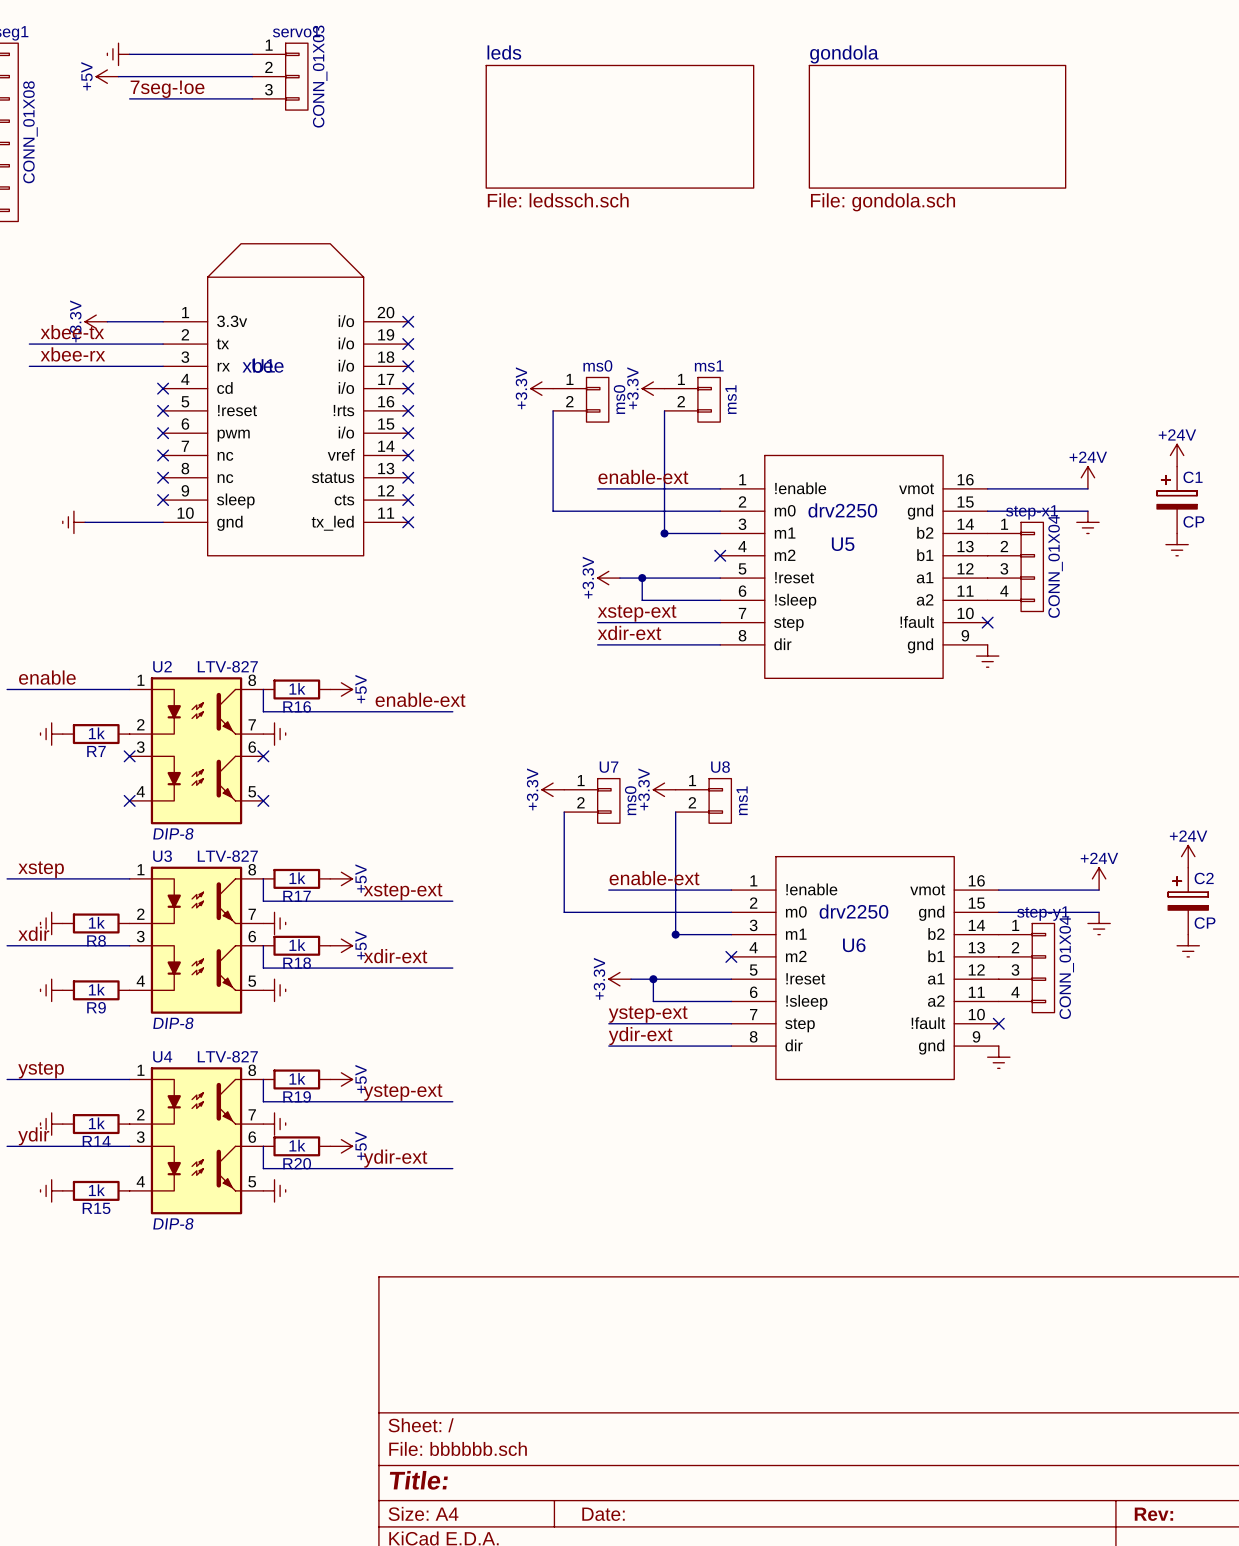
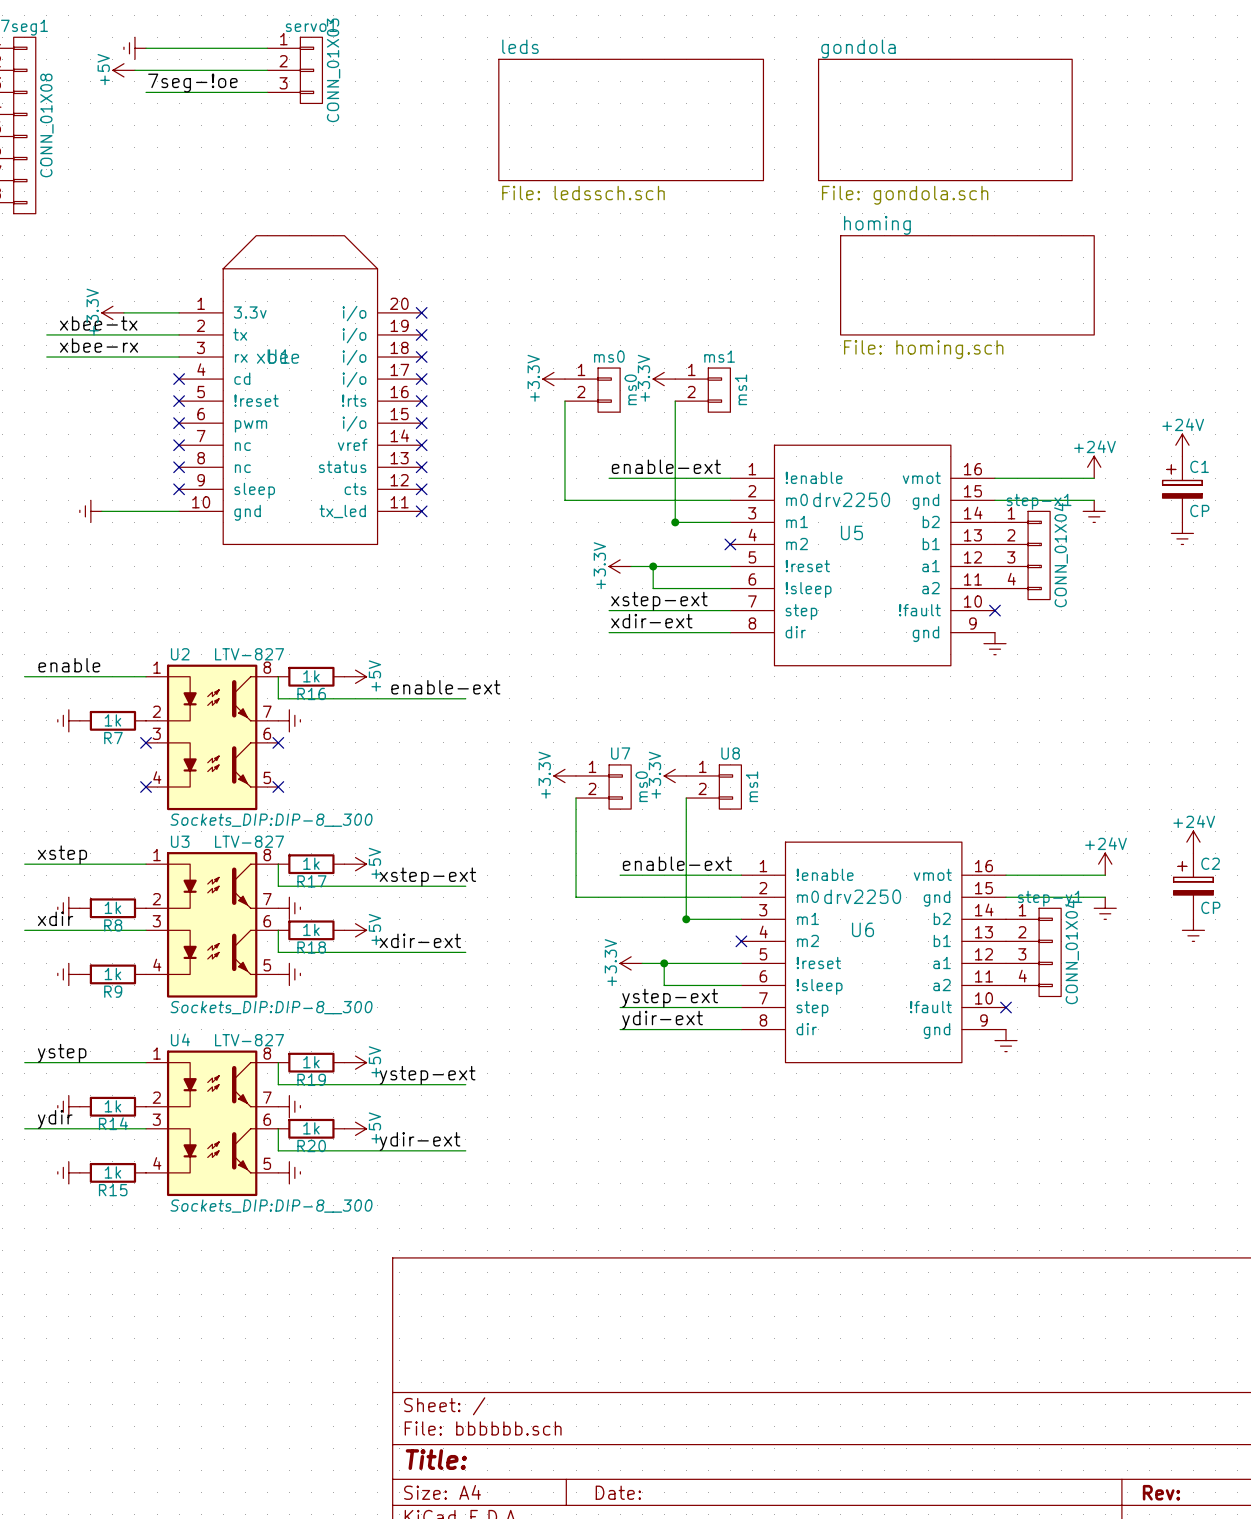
sheet homing: none -> File: homing.sch (967, 285)
U2 text: DIP-8 (173, 833) -> Sockets_DIP:DIP-8__300 (271, 820)
U3 text: DIP-8 (173, 1023) -> Sockets_DIP:DIP-8__300 (271, 1007)
U4 text: DIP-8 (173, 1223) -> Sockets_DIP:DIP-8__300 (271, 1206)

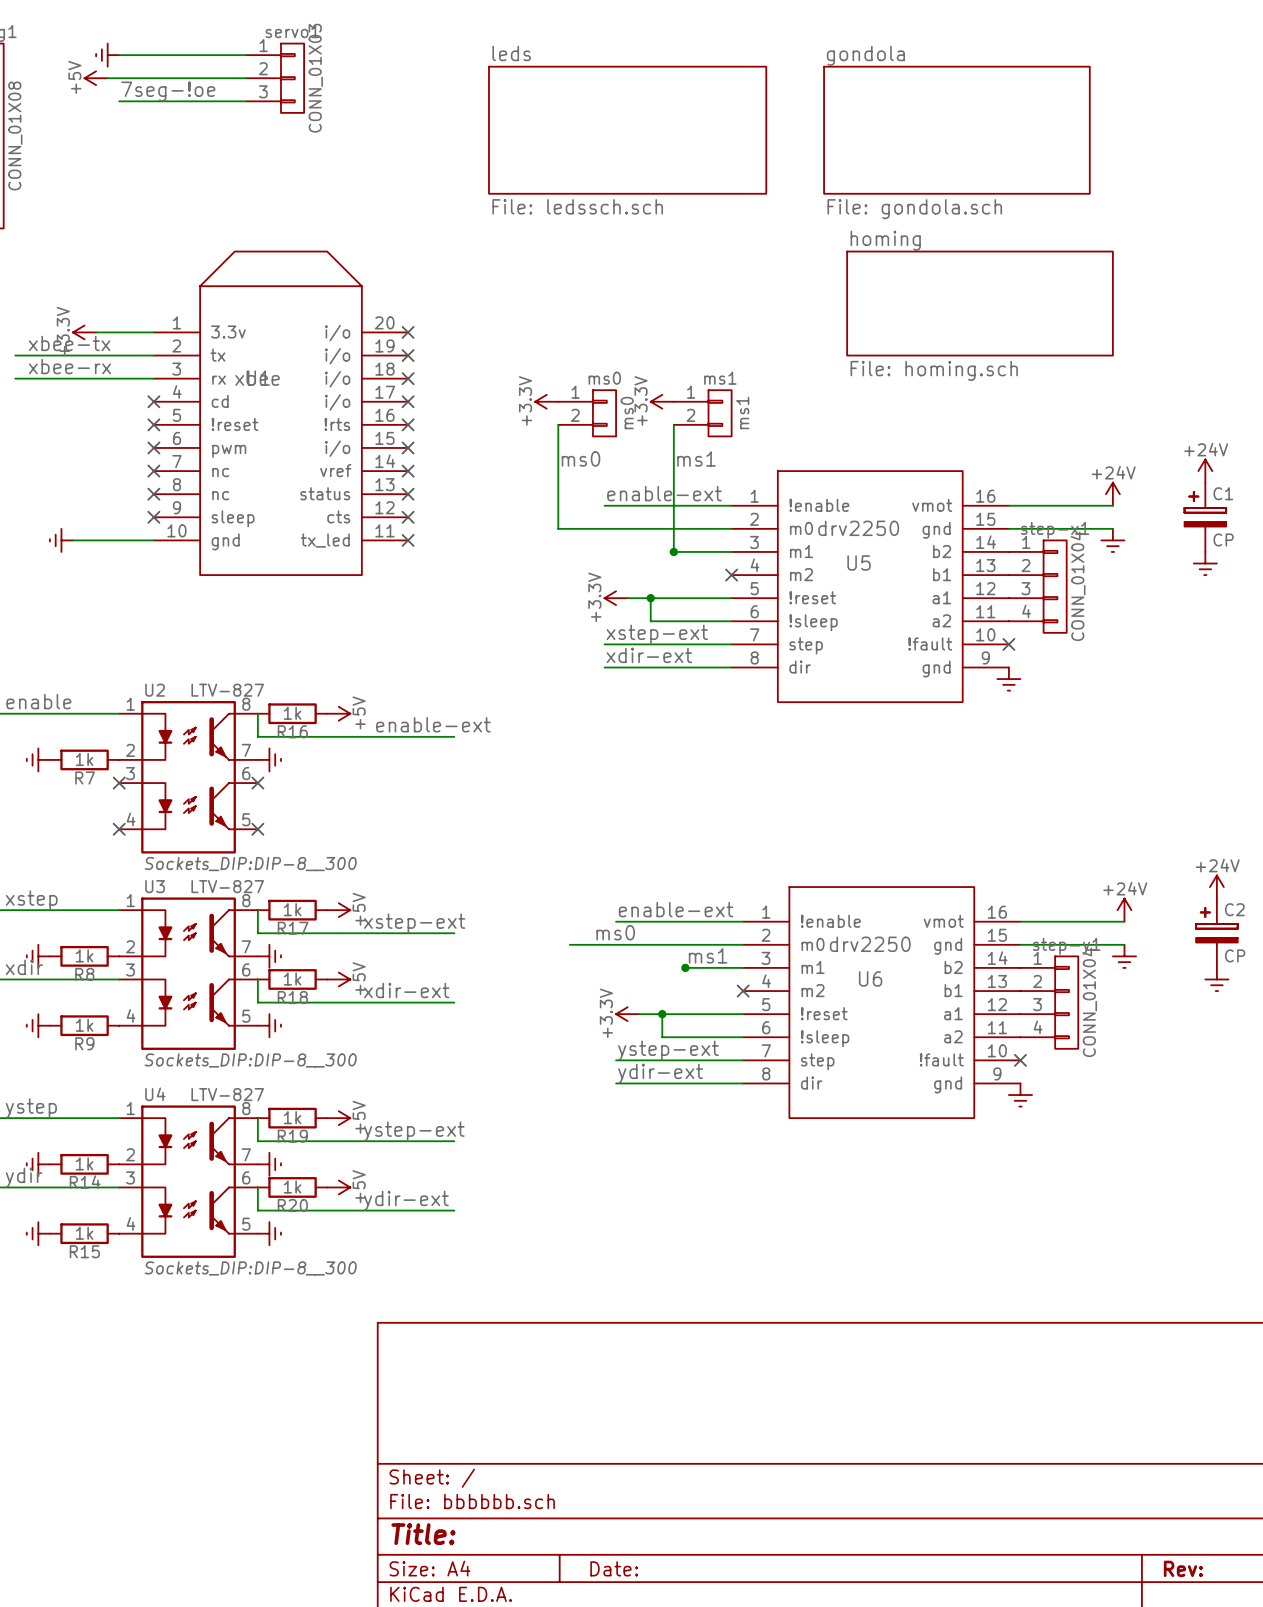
label: none -> ms0 (580, 458)
label: none -> ms1 (696, 458)
power symbol: +3.3V (564, 775) -> none
power symbol: +3.3V (675, 775) -> none
U7: ms0 (603, 787) -> none
U8: ms1 (713, 787) -> none
wire: (576, 798) (576, 897) -> none
wire: (686, 798) (686, 919) -> none
label: none -> ms0 (615, 932)
label: none -> ms1 (708, 955)

